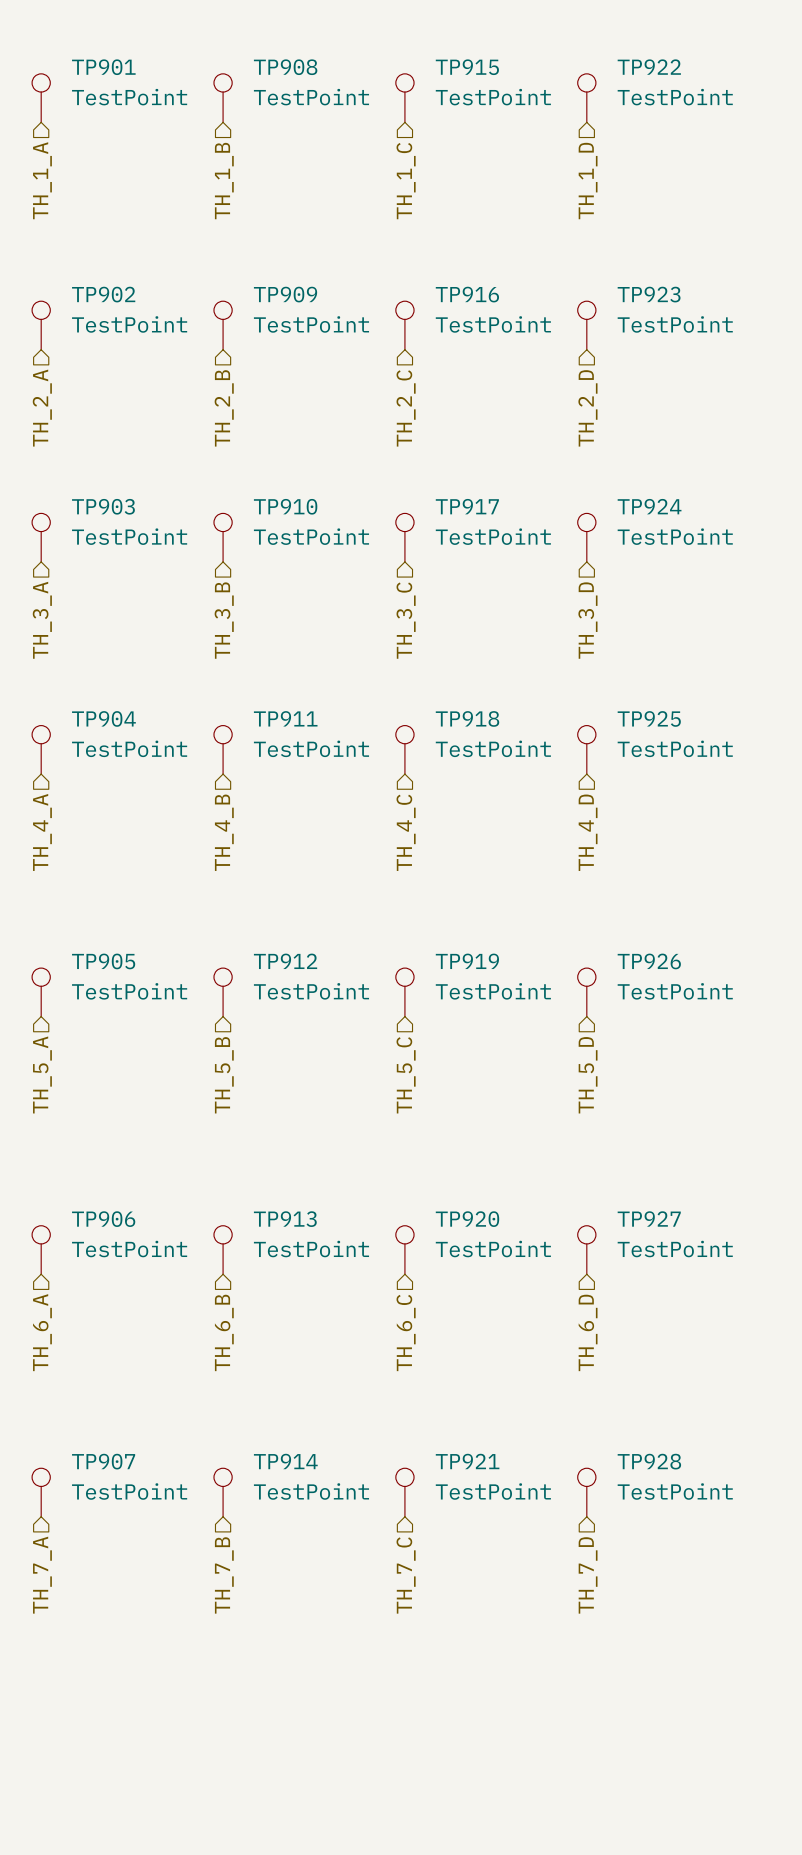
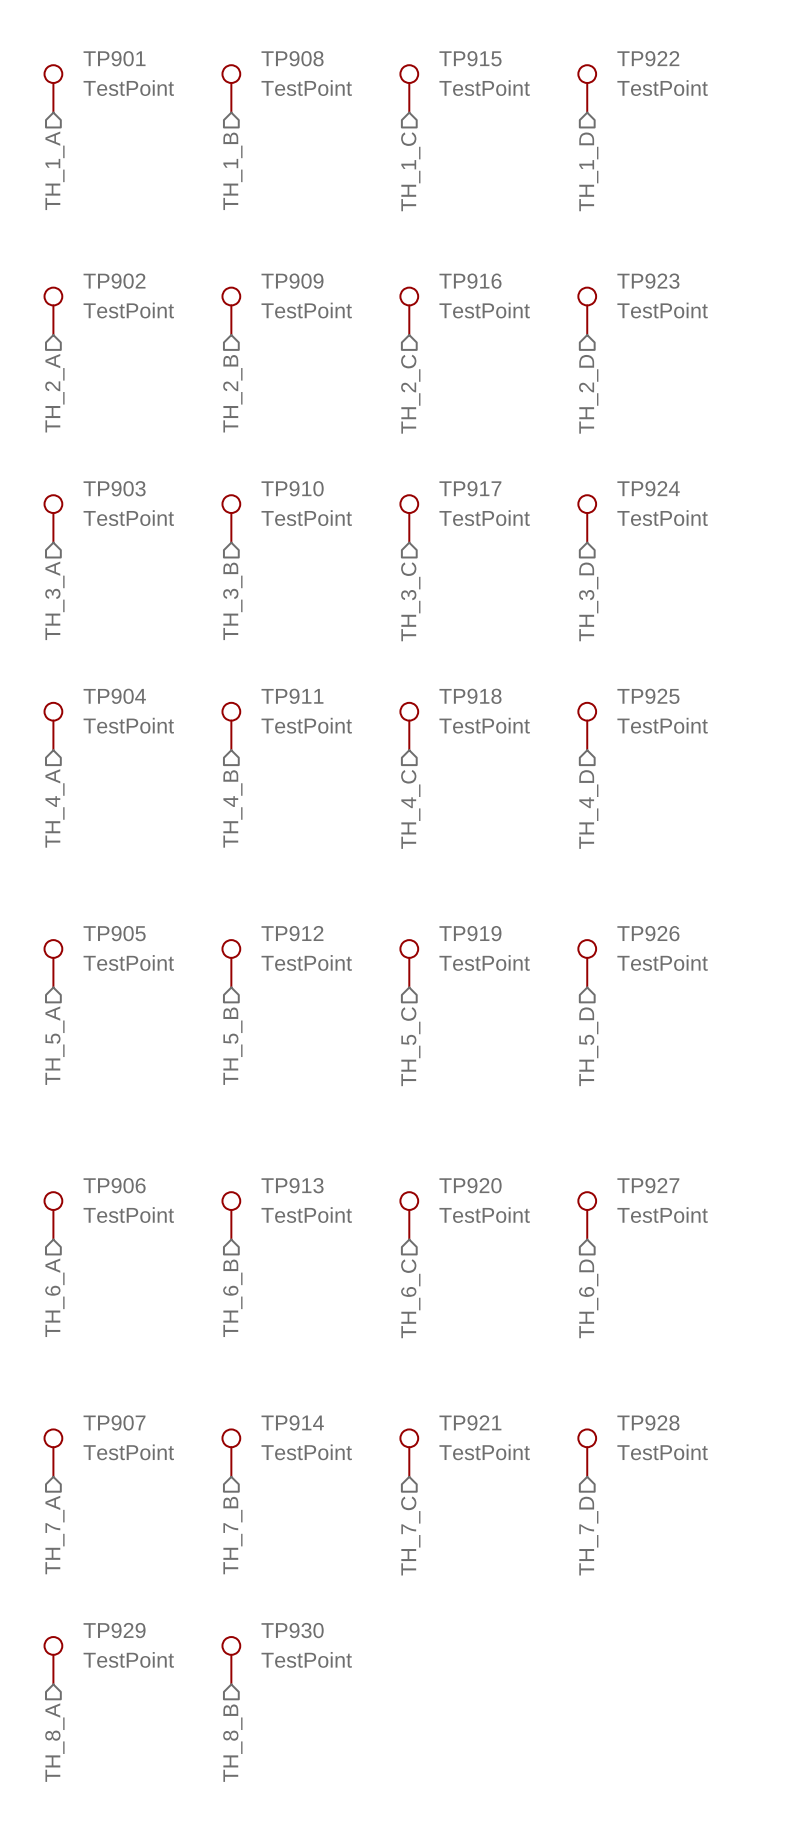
TP929: none -> TestPoint (53, 1660)
TP930: none -> TestPoint (231, 1660)
hierarchical label: none -> TH_8_A (54, 1742)
hierarchical label: none -> TH_8_B (232, 1743)

